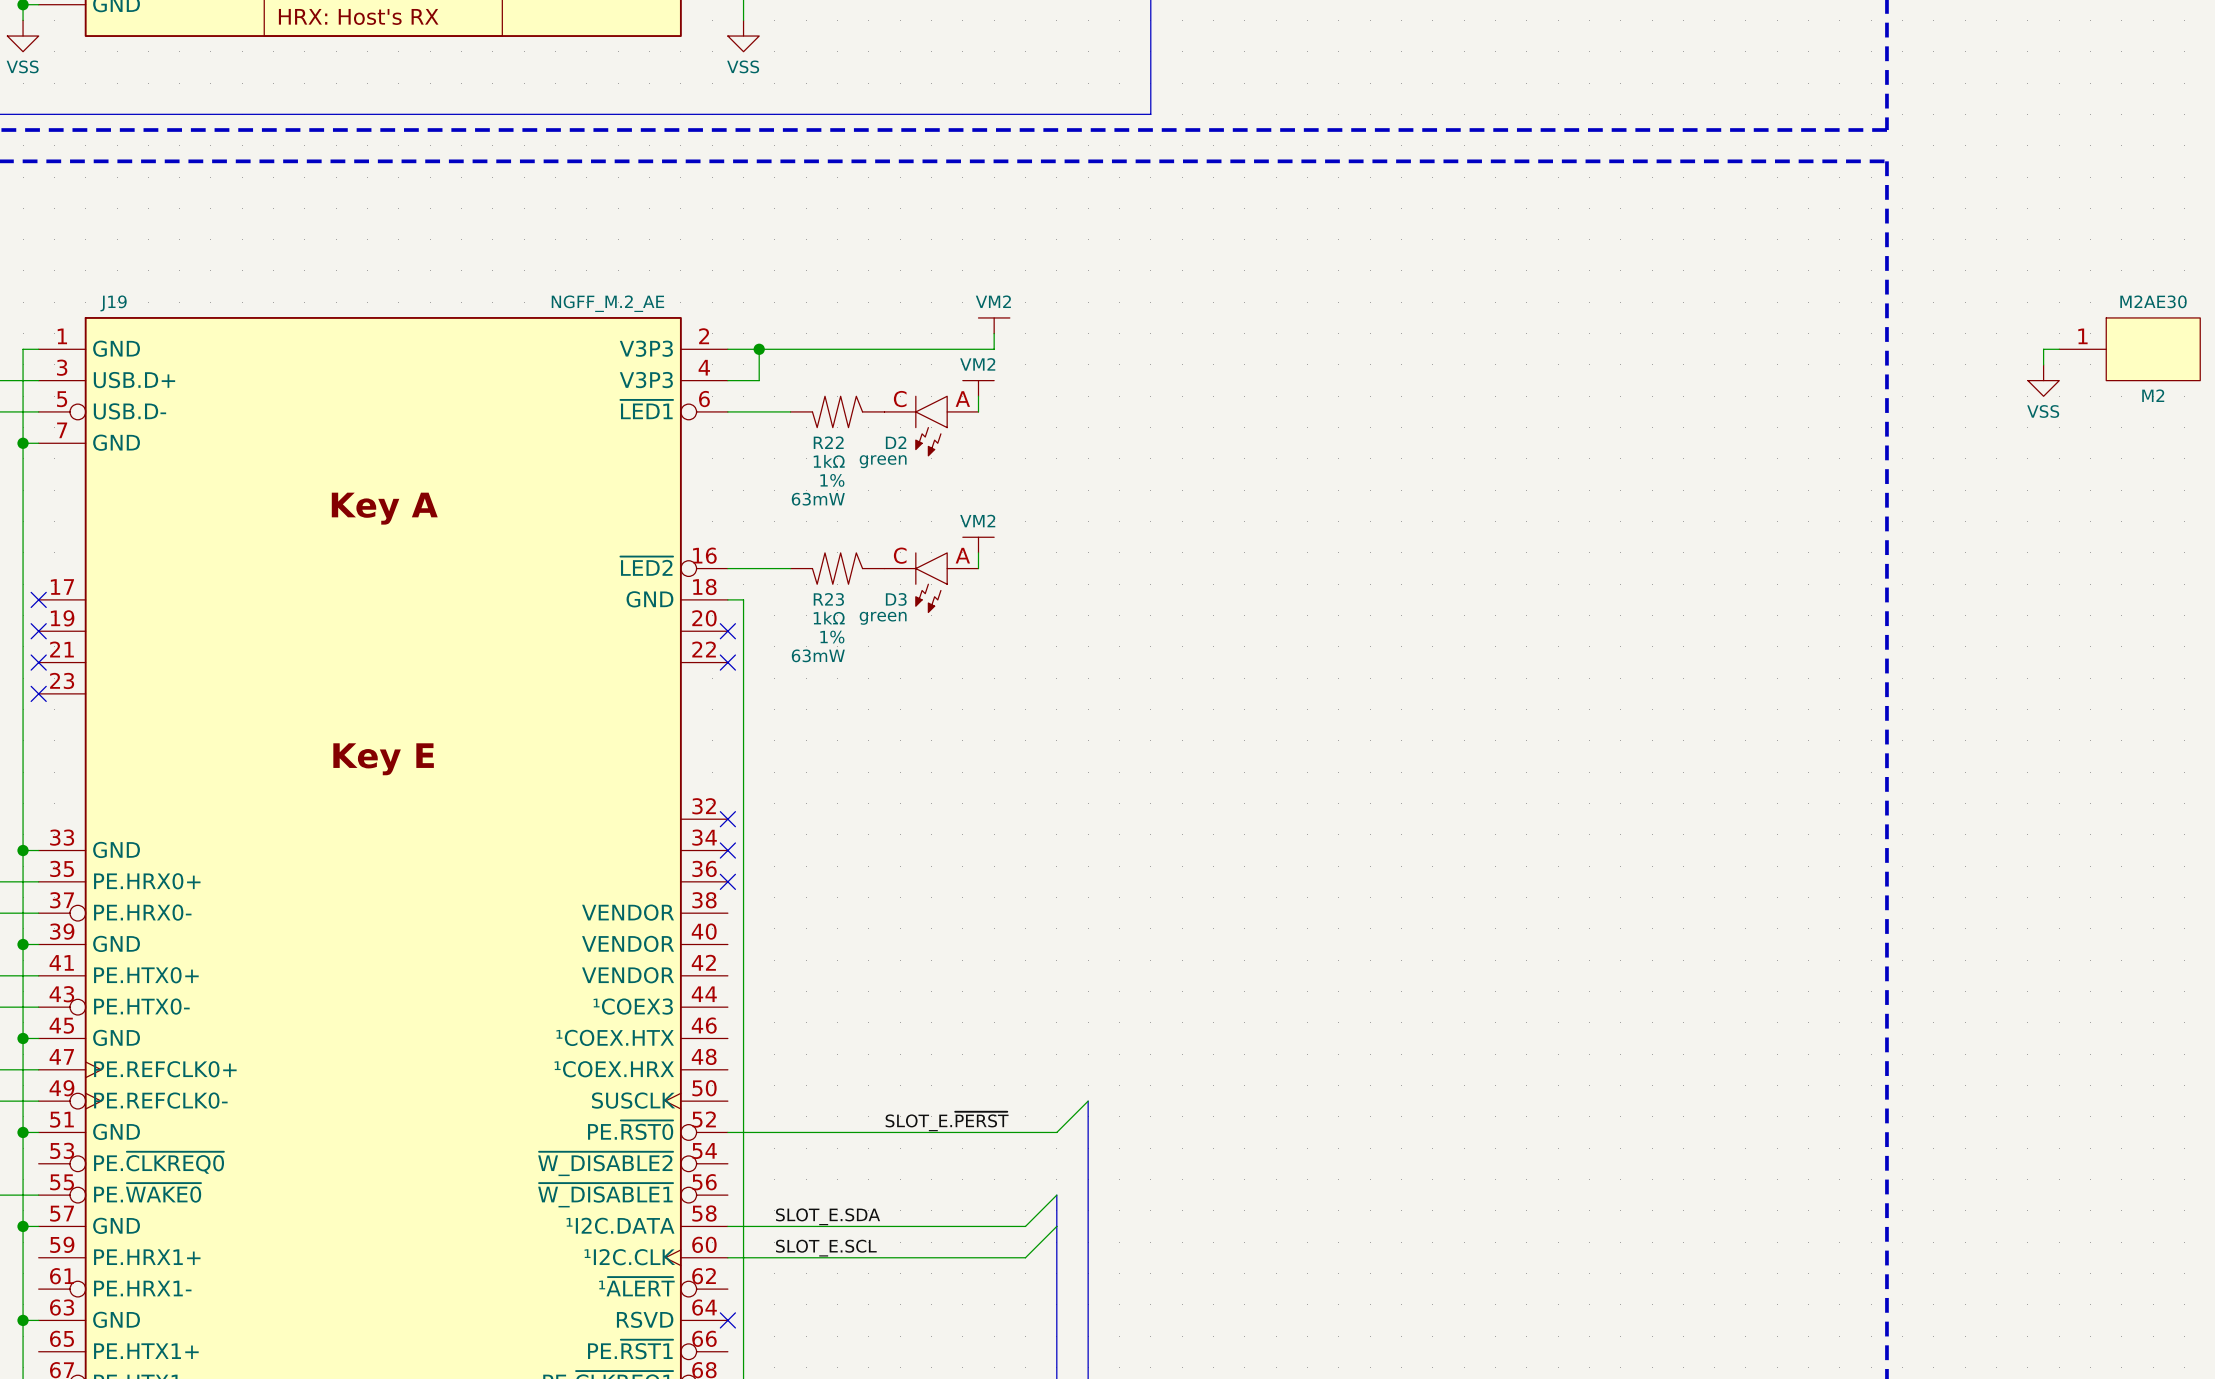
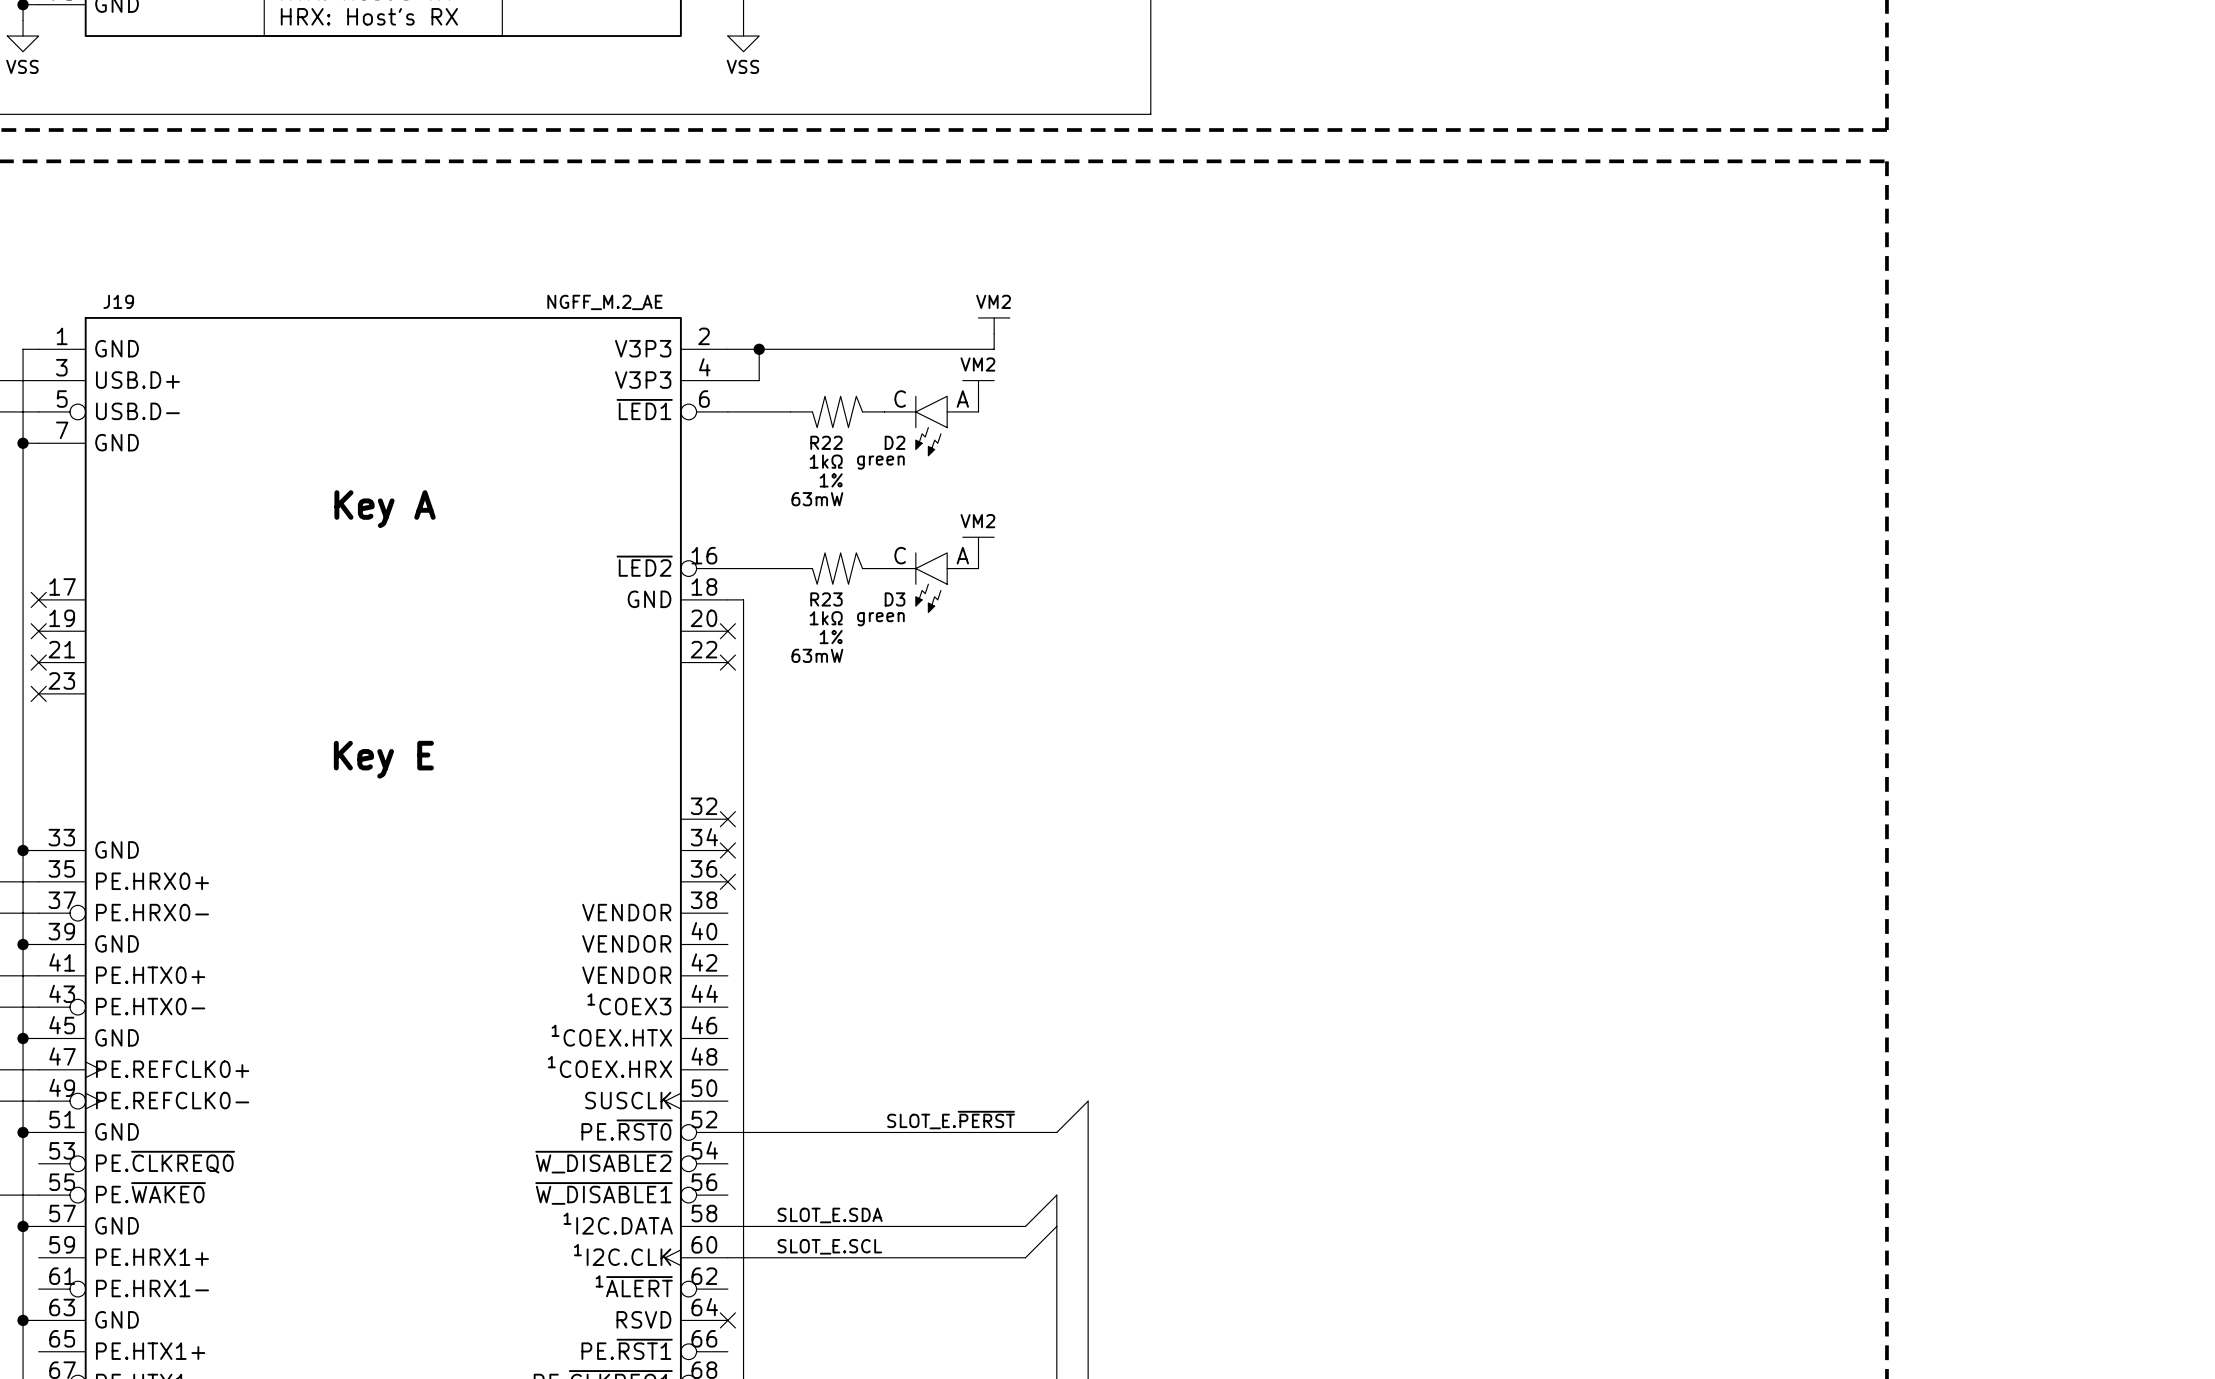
wire: (2059, 349) (2043, 349) (2043, 364) -> none
M2AE30: M2 (2129, 349) -> none
power symbol: VSS (2043, 380) -> none

